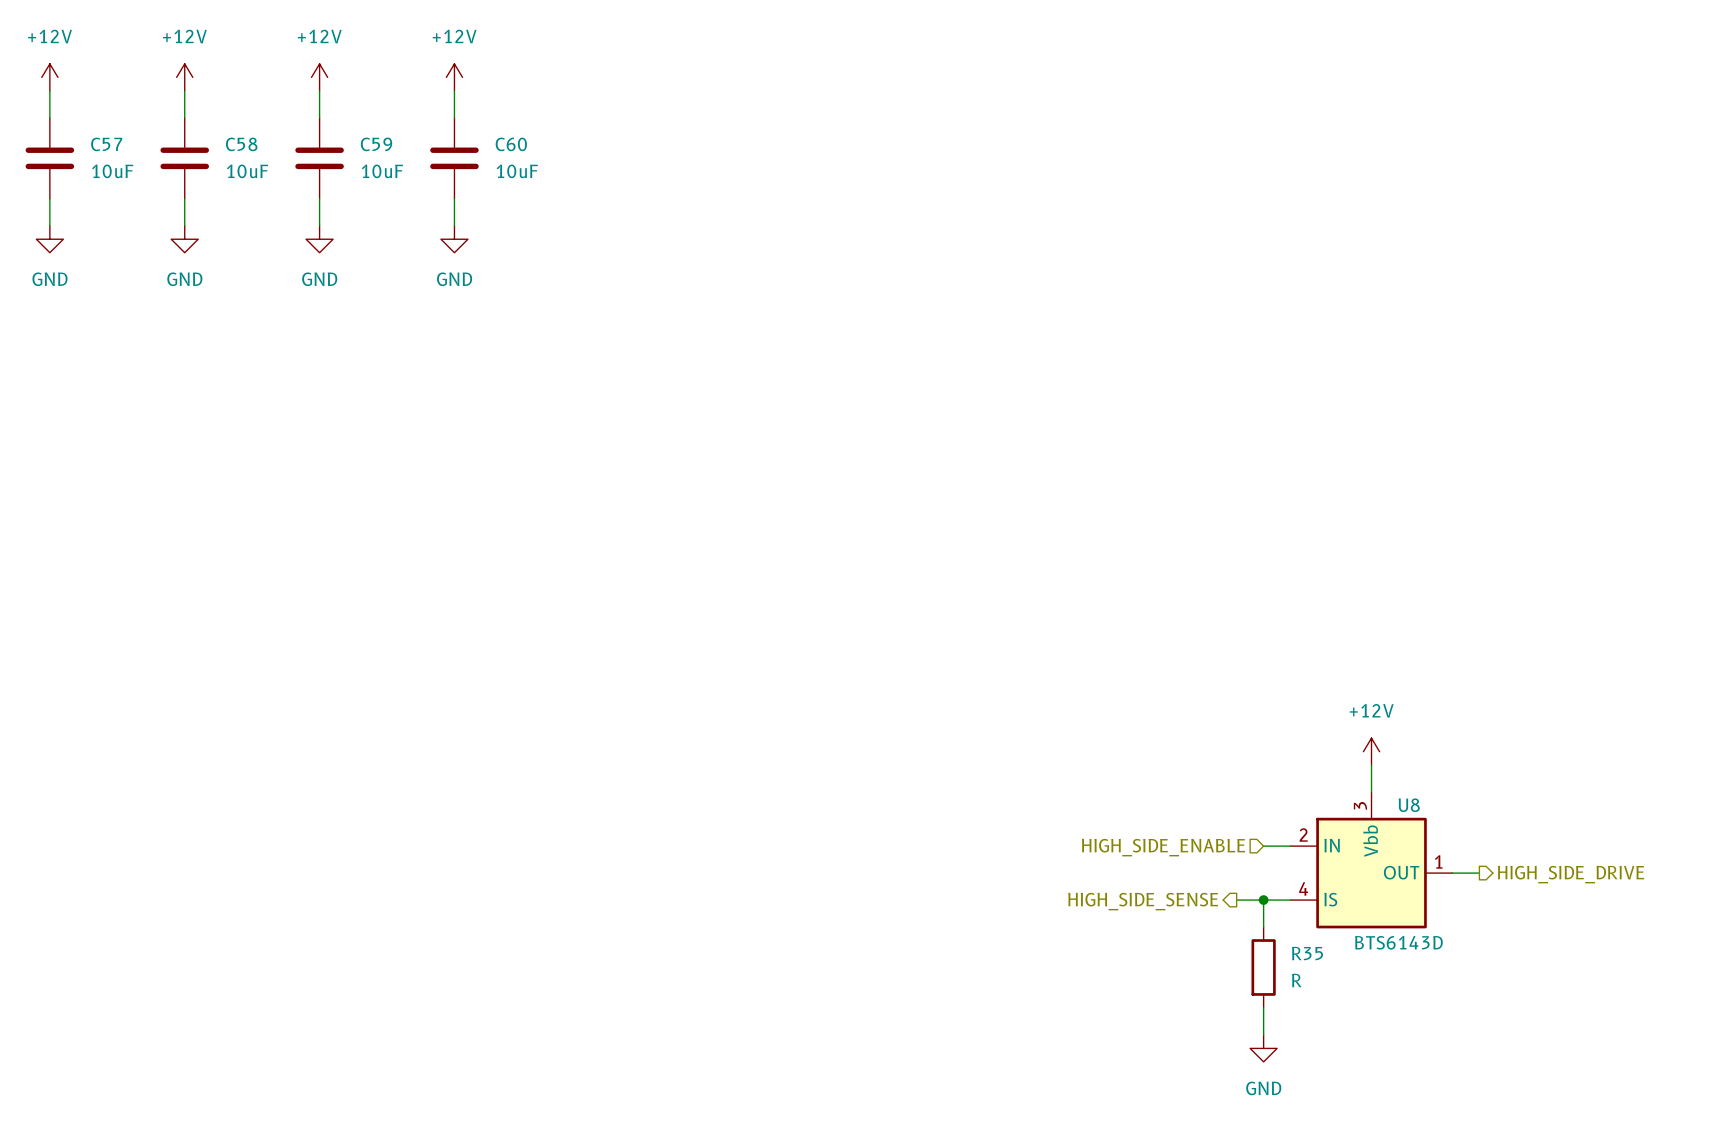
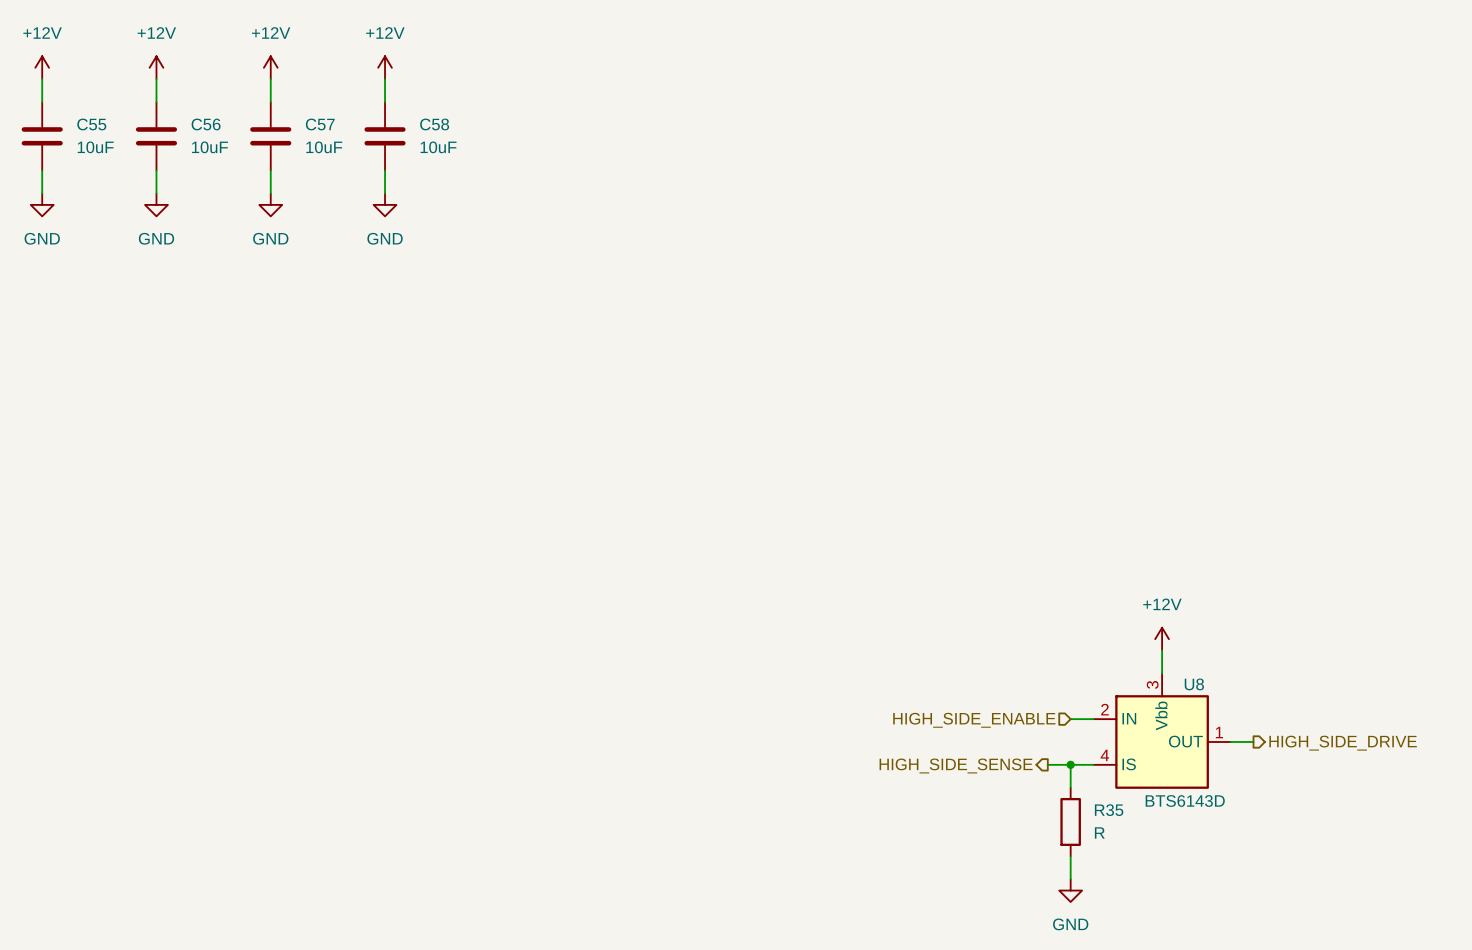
C57 name: C57 (106, 144) -> C55 (91, 124)
C58 name: C58 (241, 144) -> C56 (206, 124)
C59 name: C59 (376, 144) -> C57 (320, 124)
C60 name: C60 (511, 144) -> C58 (434, 124)

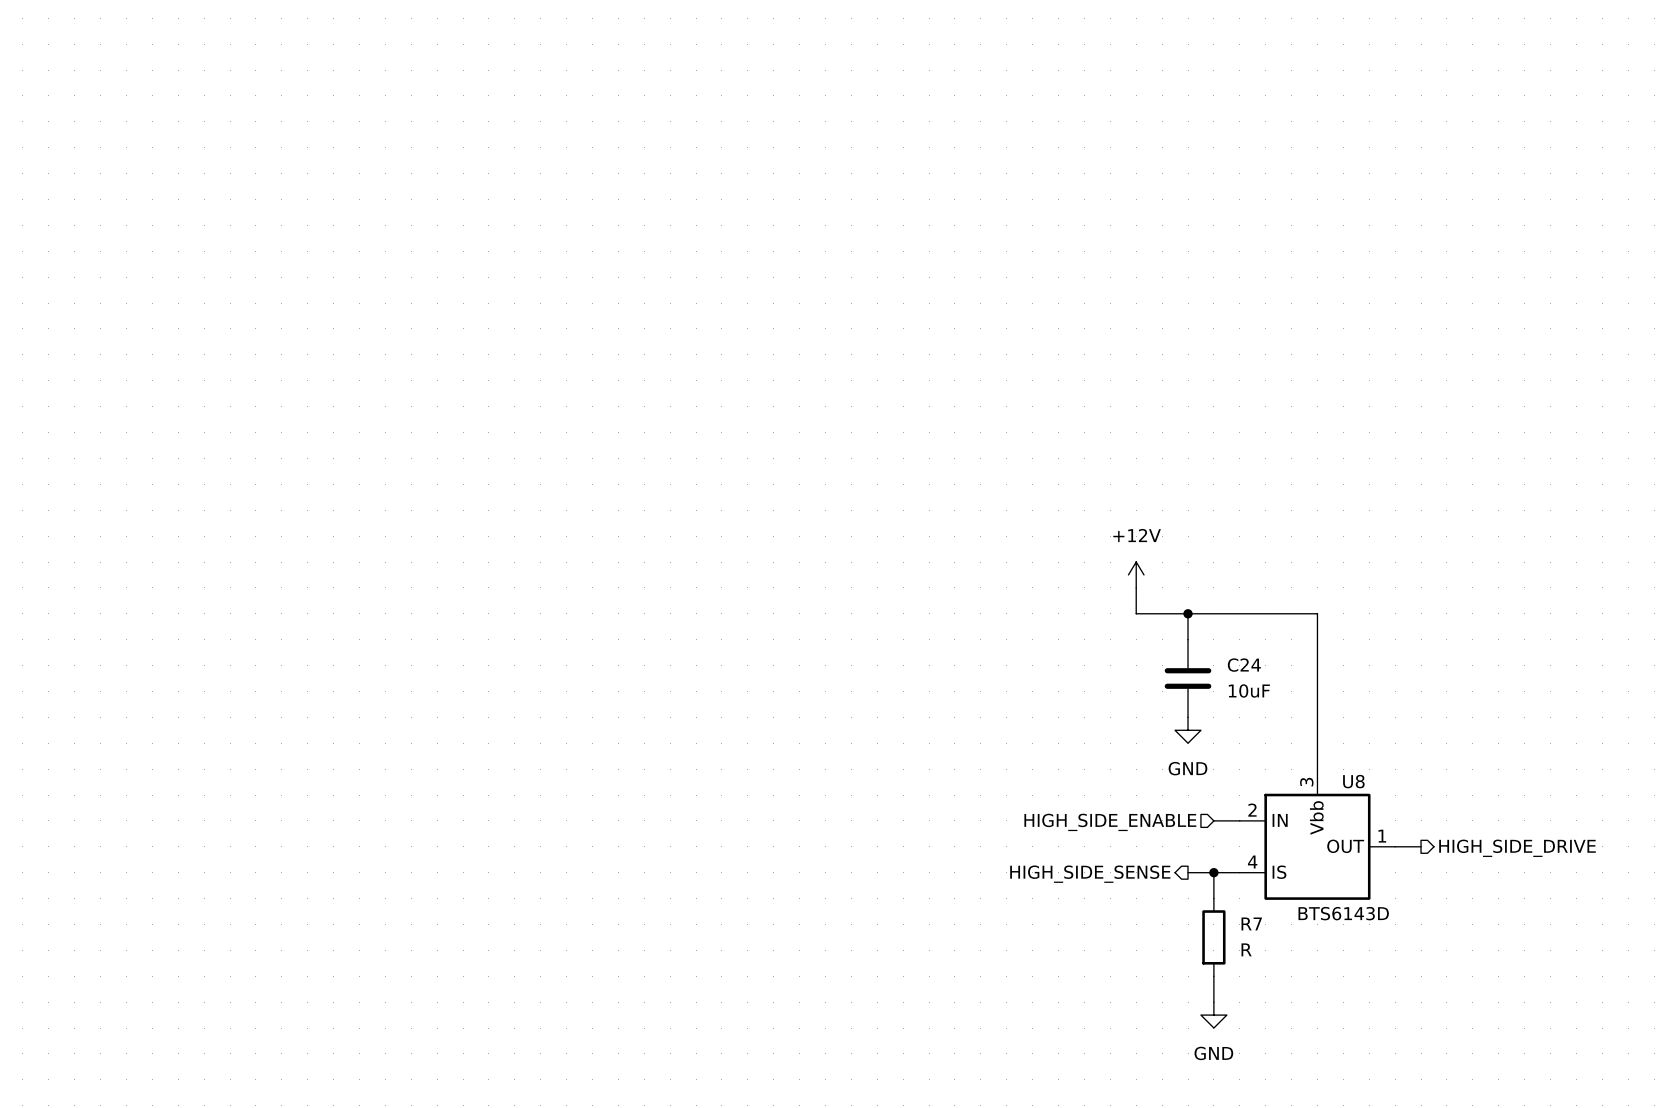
power symbol: +12V (42, 67) -> none
power symbol: +12V (156, 67) -> none
power symbol: +12V (270, 67) -> none
power symbol: +12V (385, 67) -> none
wire: (42, 79) (42, 102) -> none
wire: (156, 79) (156, 102) -> none
wire: (270, 79) (270, 102) -> none
wire: (385, 79) (385, 102) -> none
C55: 10uF (42, 136) -> none
C56: 10uF (156, 136) -> none
C57: 10uF (270, 136) -> none
C58: 10uF (385, 136) -> none
wire: (42, 170) (42, 193) -> none
wire: (156, 170) (156, 193) -> none
wire: (270, 170) (270, 193) -> none
wire: (385, 170) (385, 193) -> none
power symbol: GND (42, 204) -> none
power symbol: GND (156, 204) -> none
power symbol: GND (270, 204) -> none
power symbol: GND (385, 204) -> none
wire: none -> (1136, 587) (1136, 613) (1317, 613) (1317, 743)
wire: none -> (1188, 613) (1188, 639)
junction: none -> (1188, 613)
C24: none -> 10uF (1188, 678)
power symbol: none -> GND (1188, 730)
power symbol position: +12V (1162, 639) -> +12V (1136, 574)
R35 name: R35 (1109, 810) -> R7 (1251, 923)

